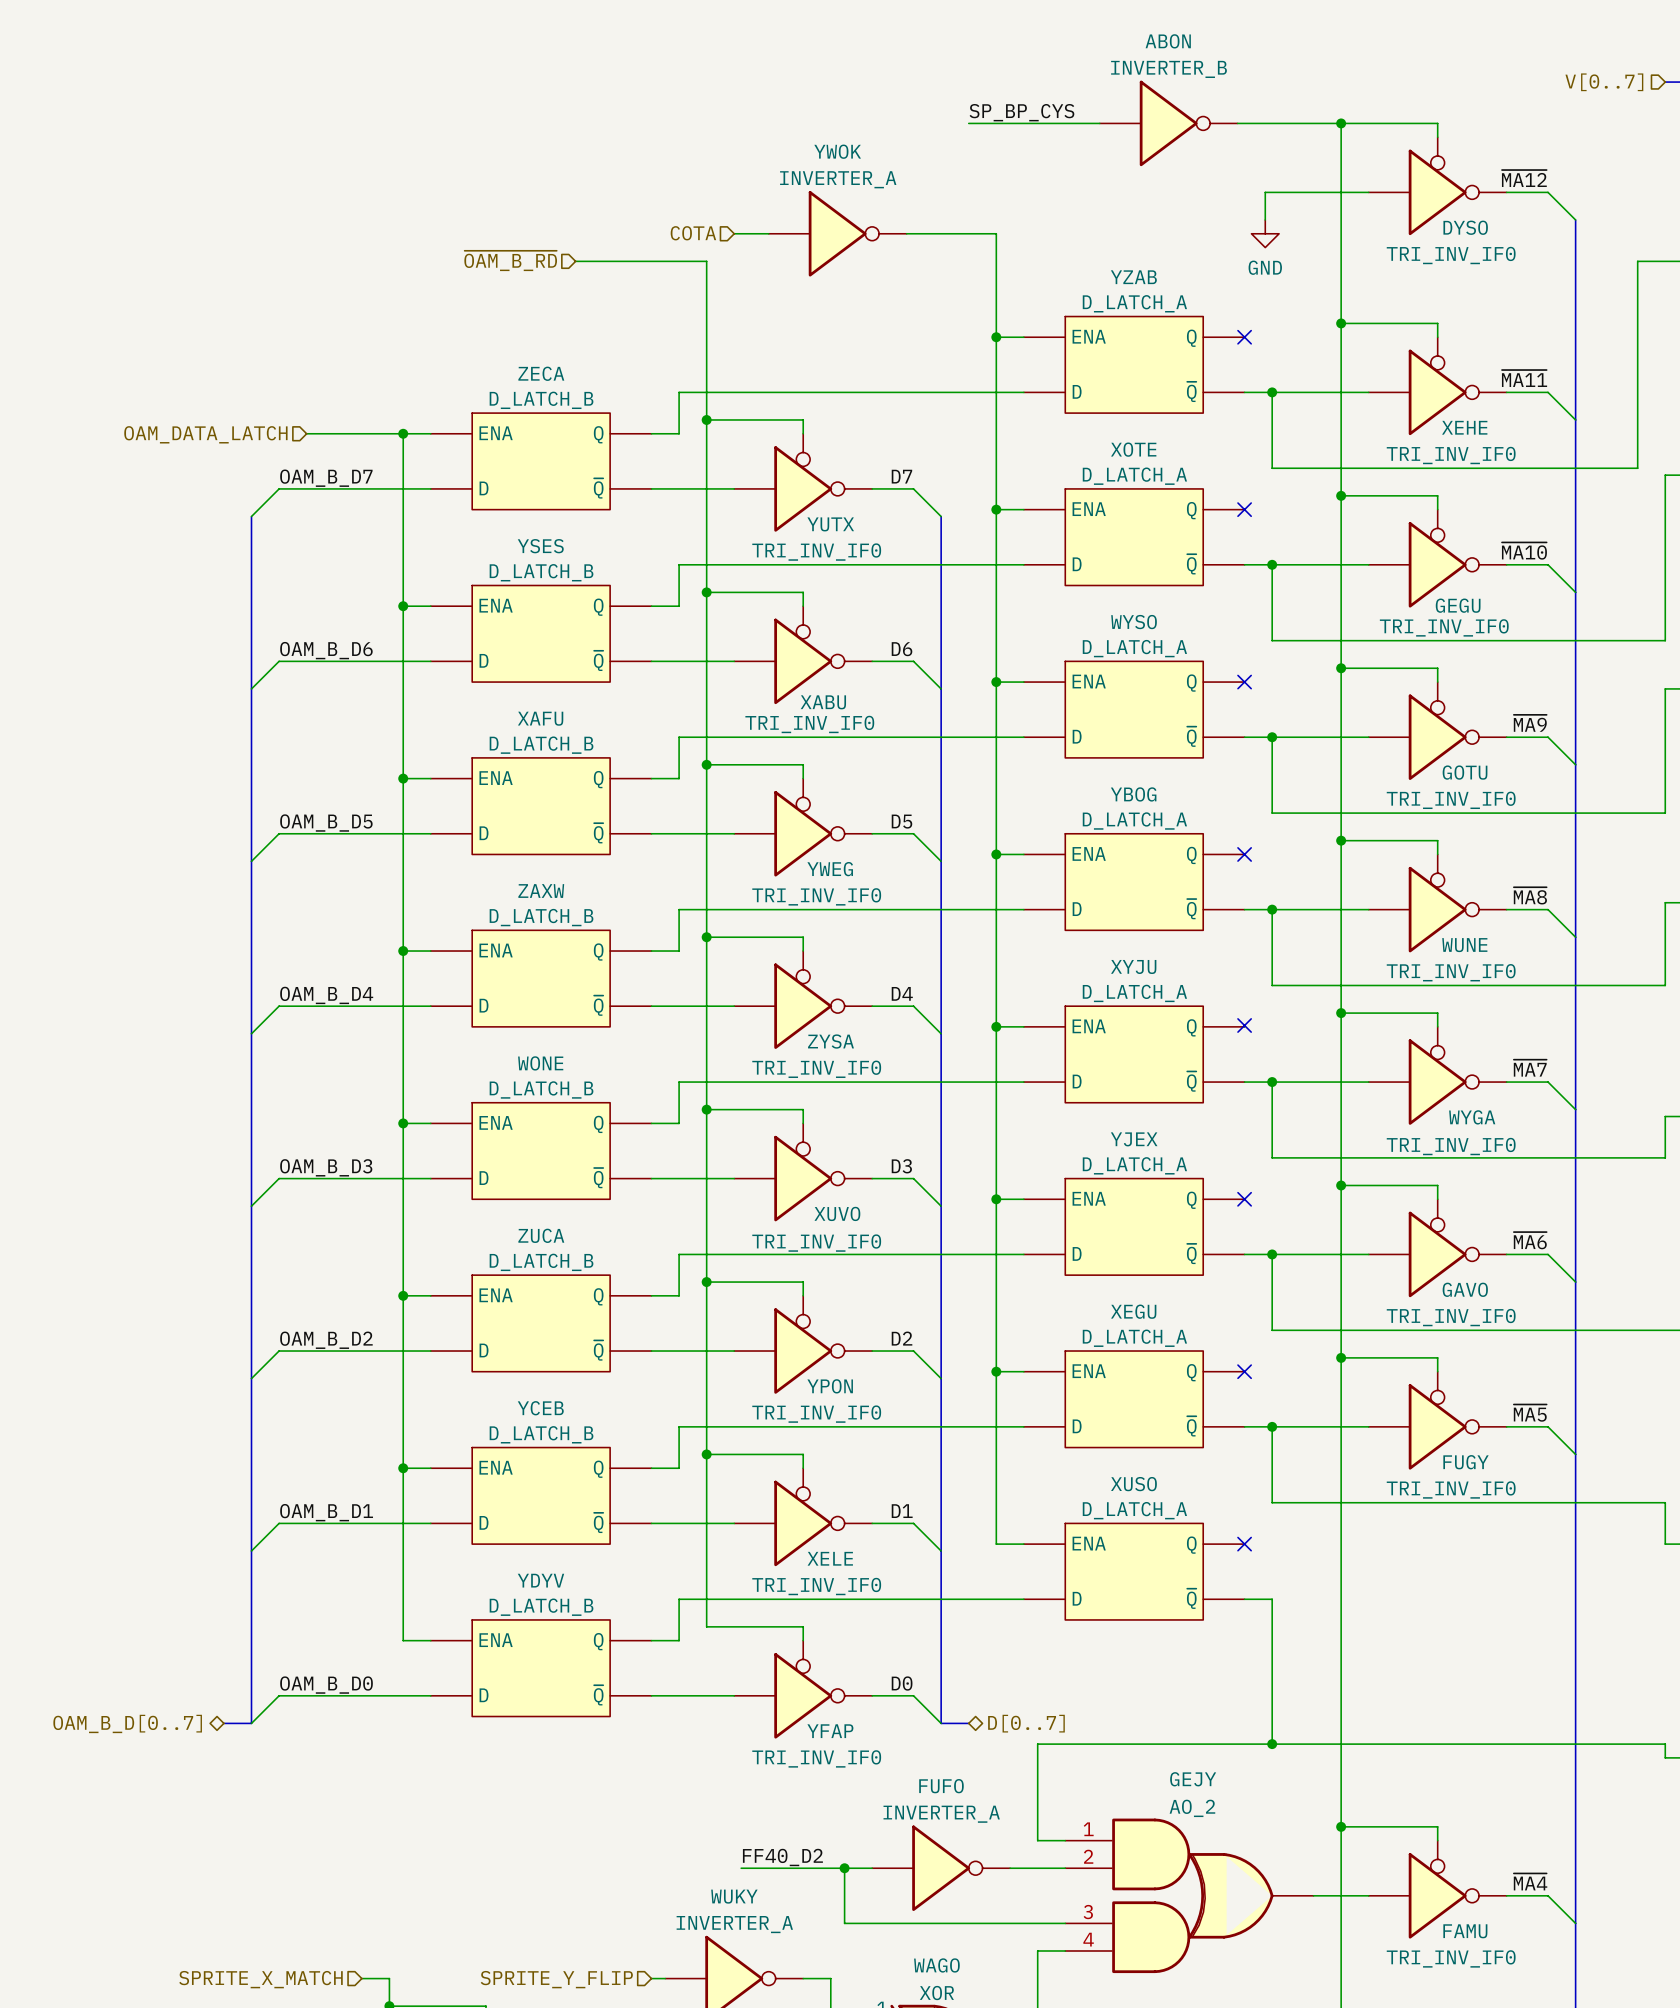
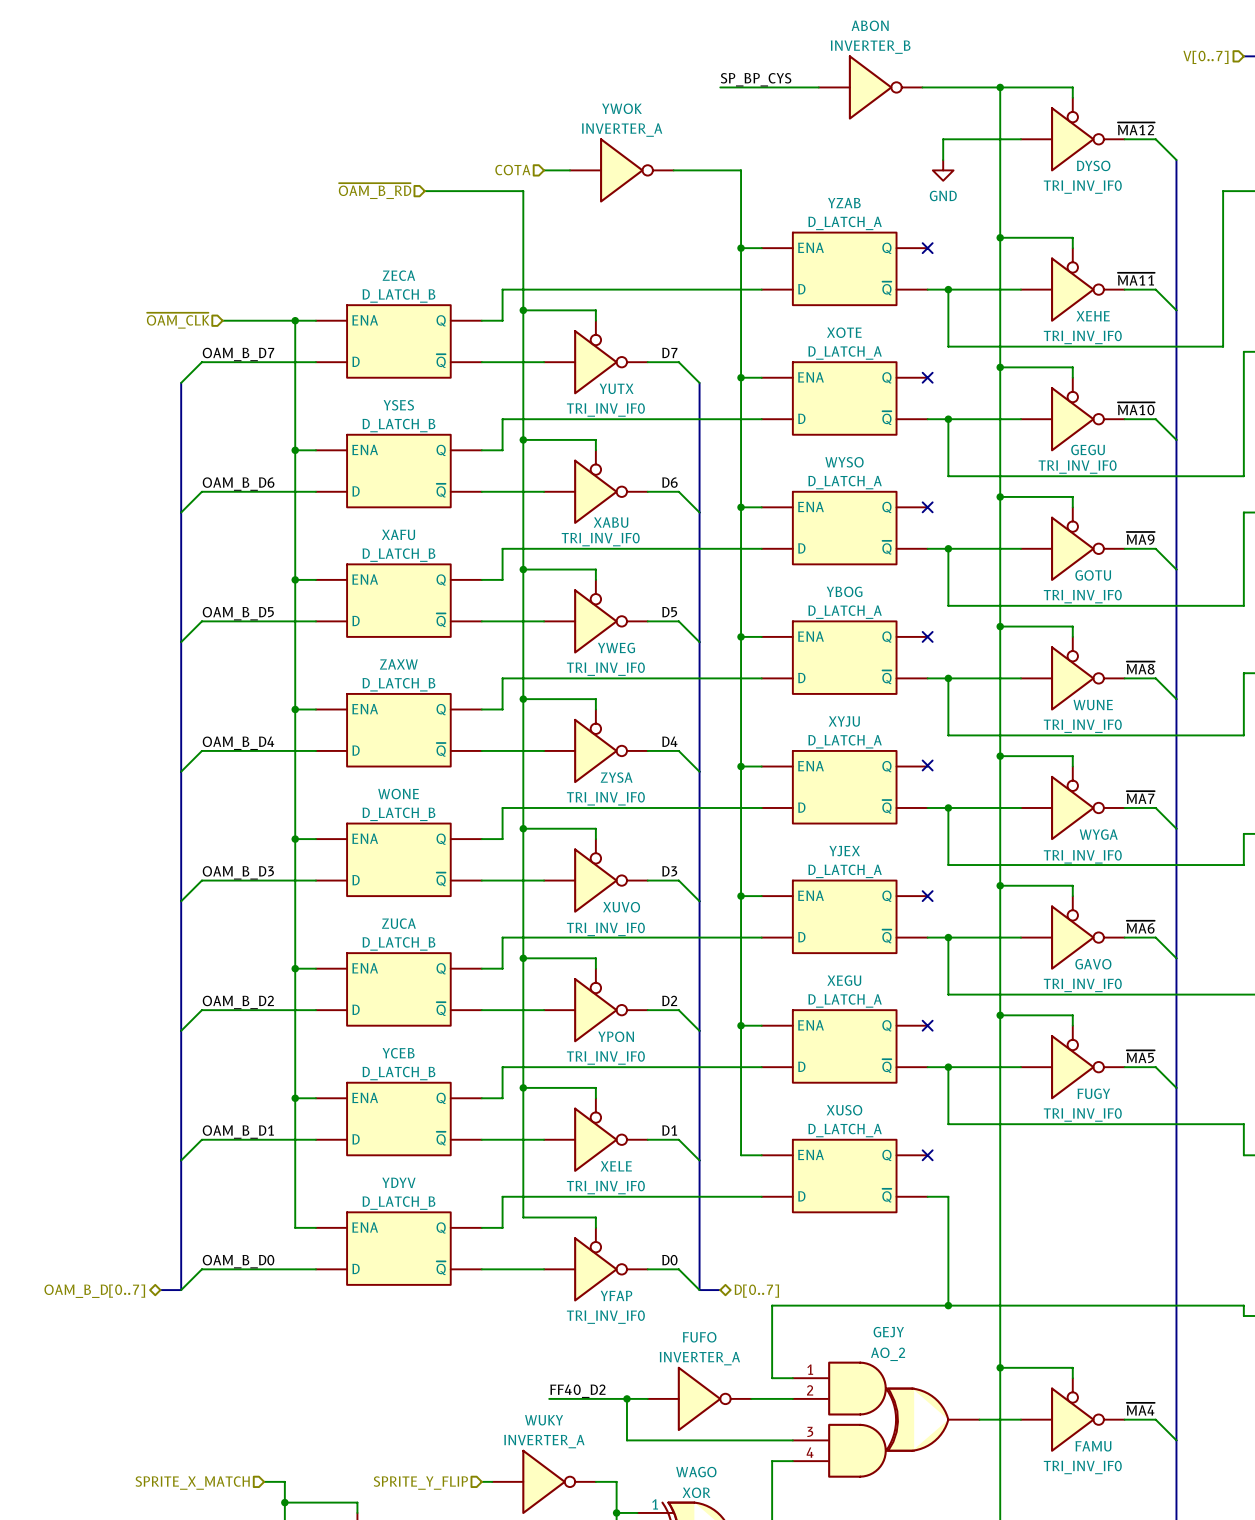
hierarchical label: OAM_DATA_LATCH (205, 434) -> ~{OAM_CLK} (178, 320)

